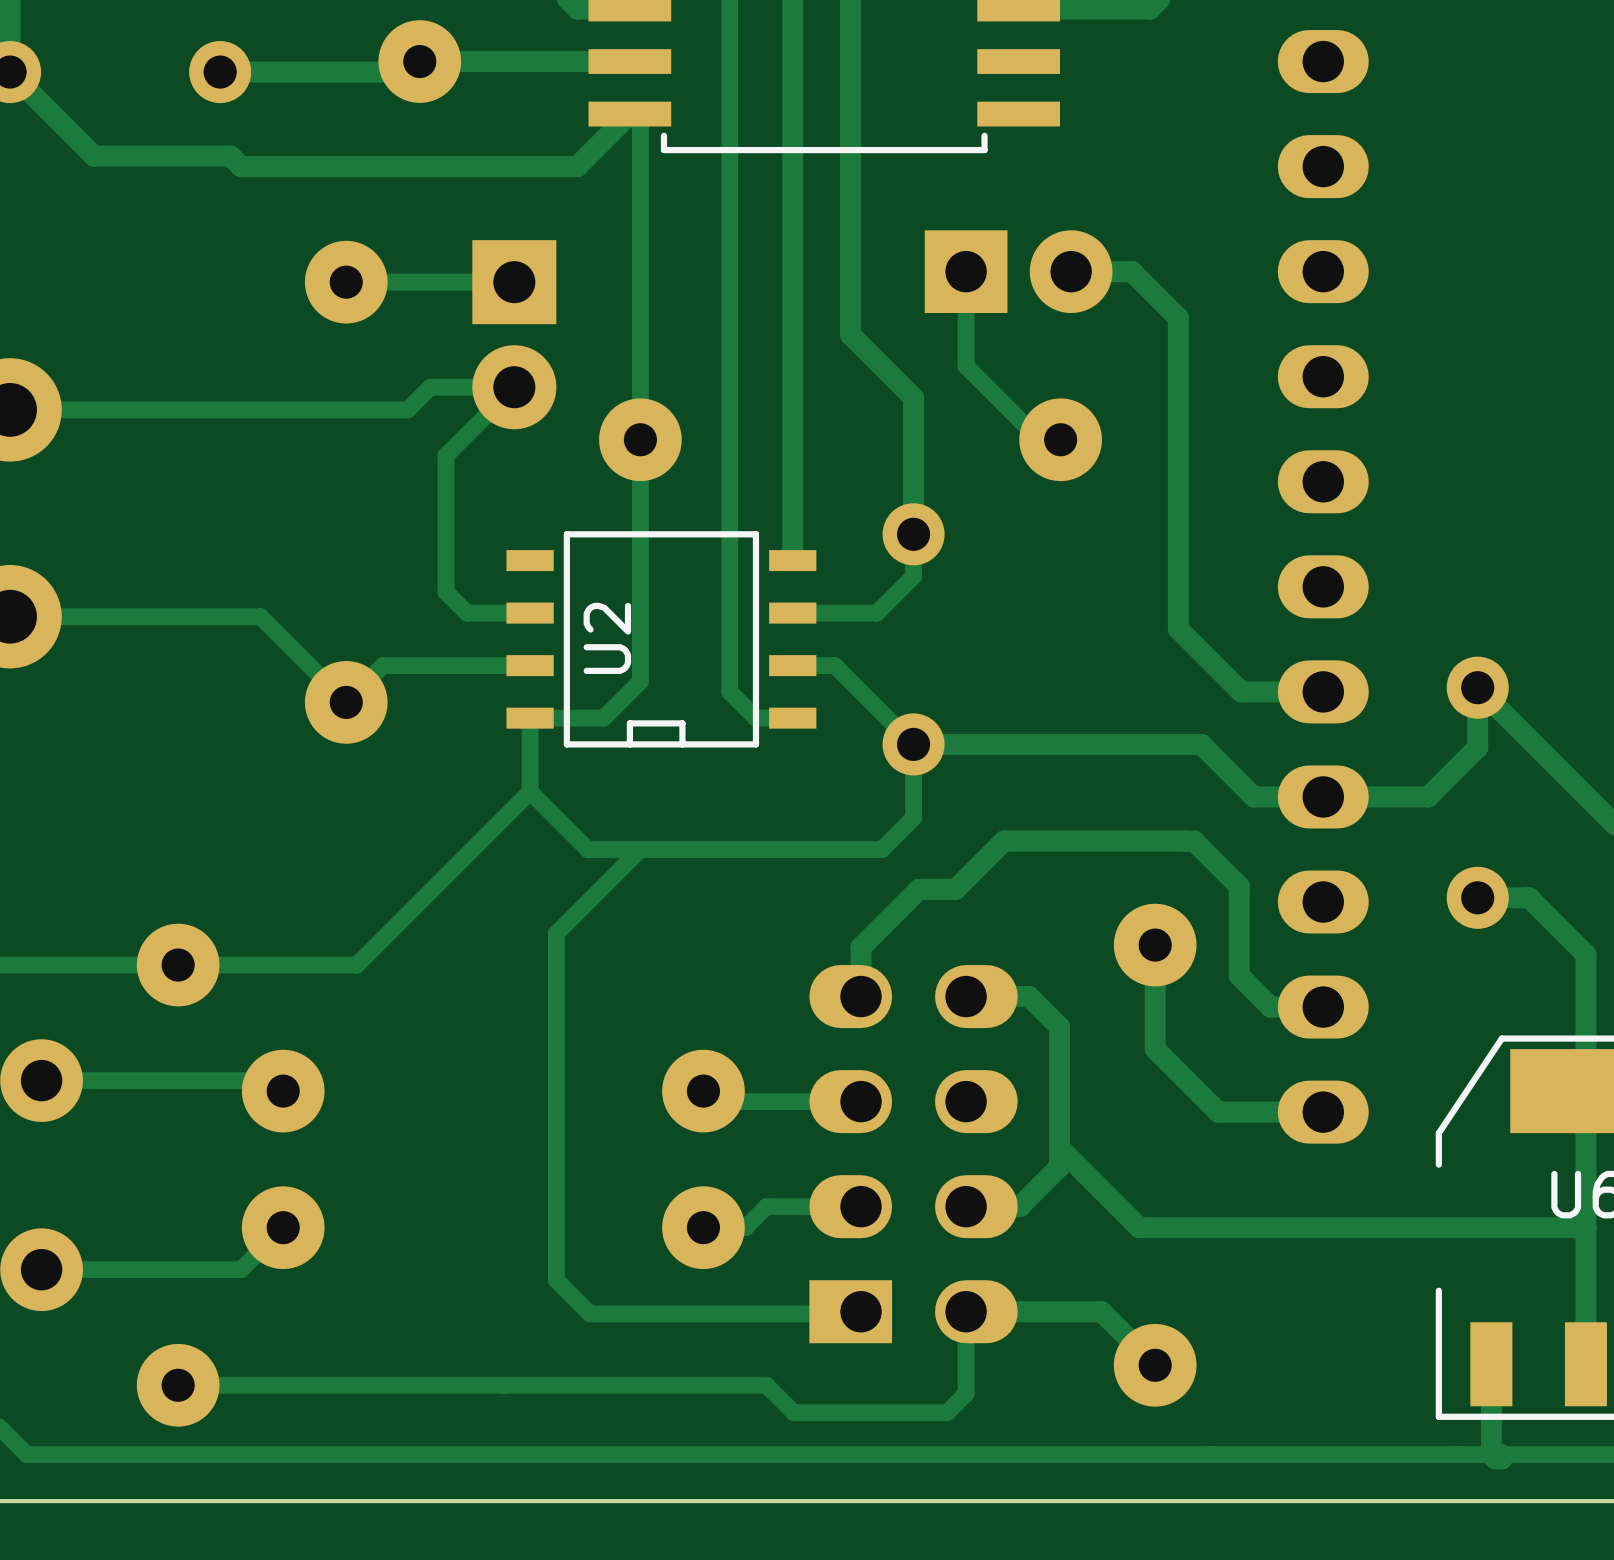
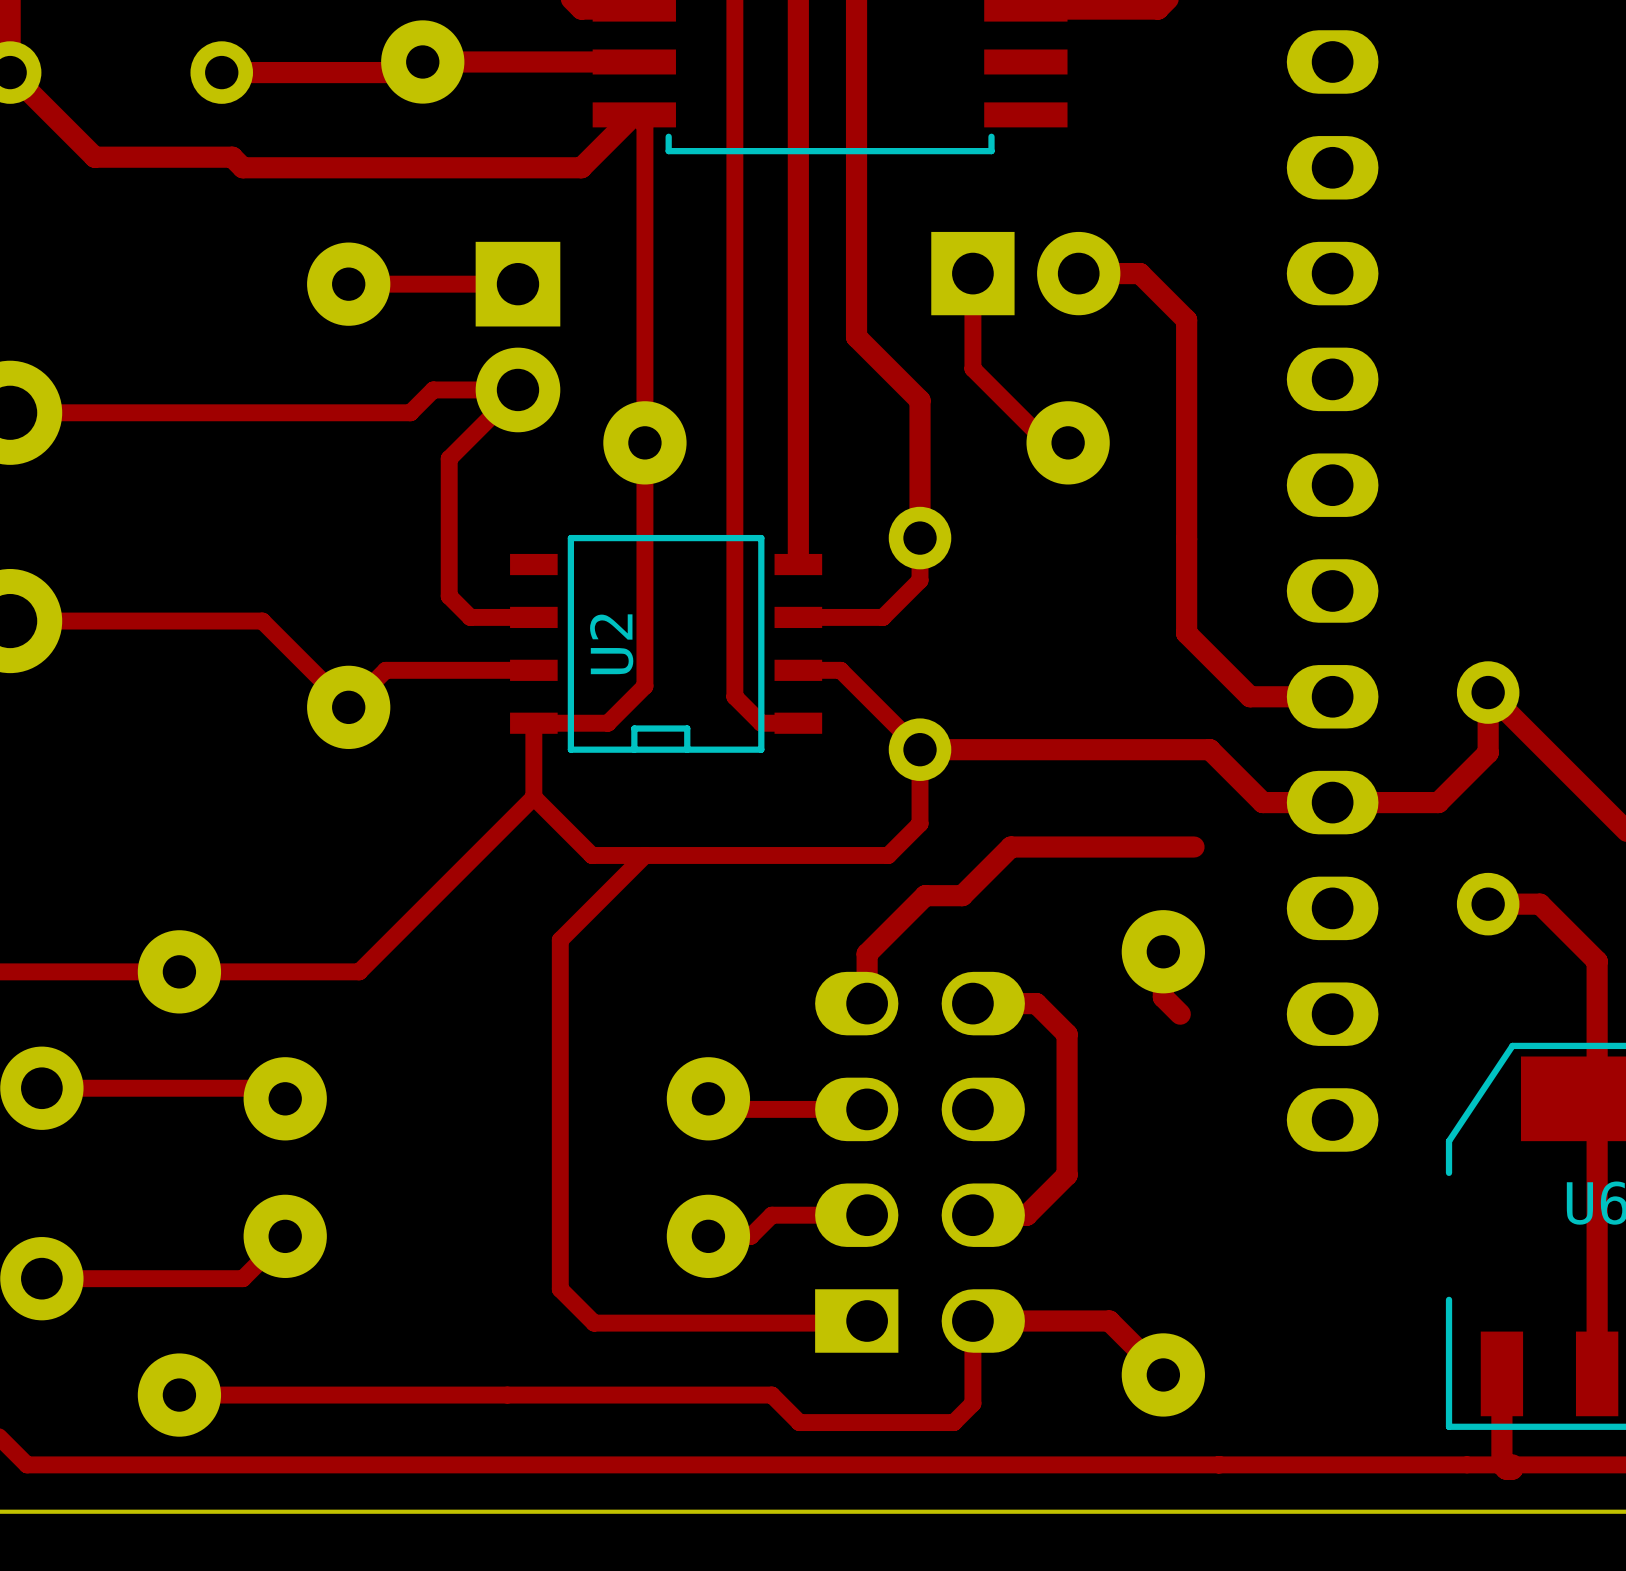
track: (1185, 841) (1194, 841) (1239, 886) (1239, 975) (1270, 1007) (1323, 1007) -> none
track: (1155, 990) (1155, 1049) (1218, 1112) (1323, 1112) -> (1163, 997) (1180, 1014)
track: (1059, 1147) (1139, 1227) (1585, 1227) -> none

